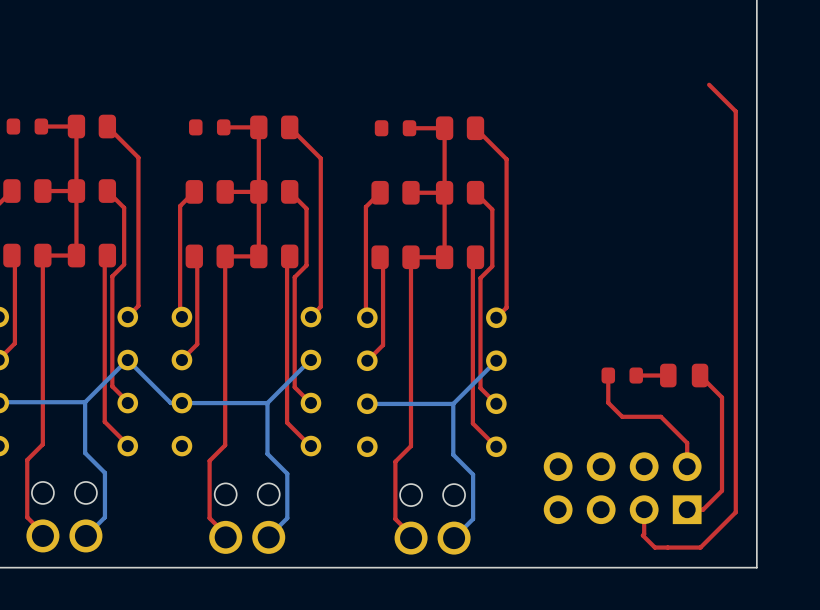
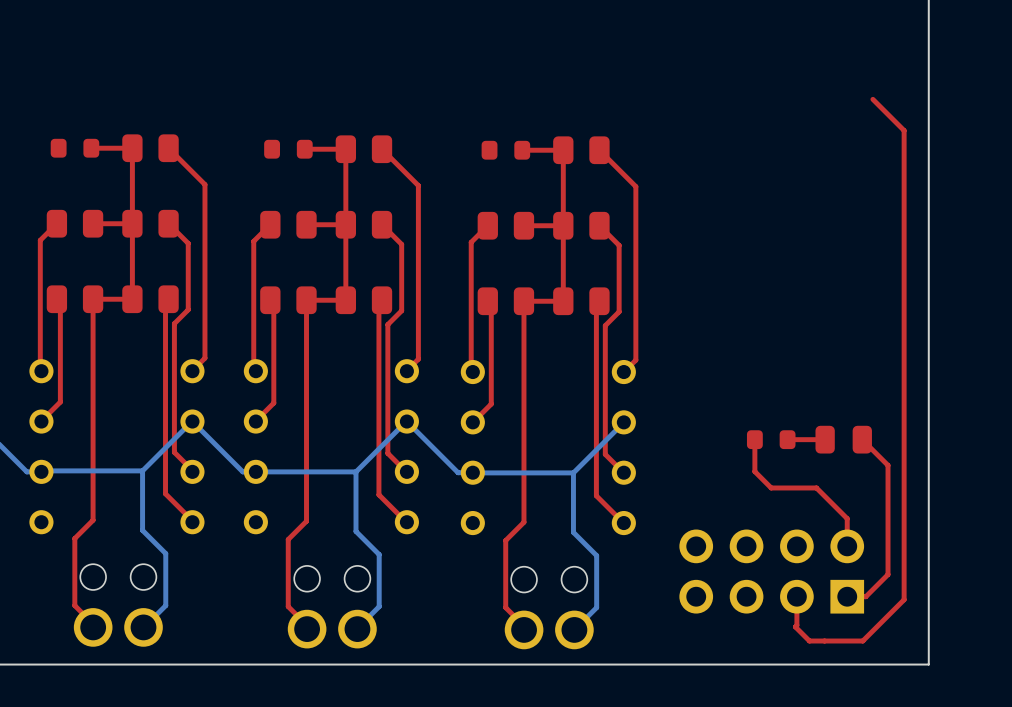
bottom track: none -> (406, 421) (458, 472) (472, 472)

